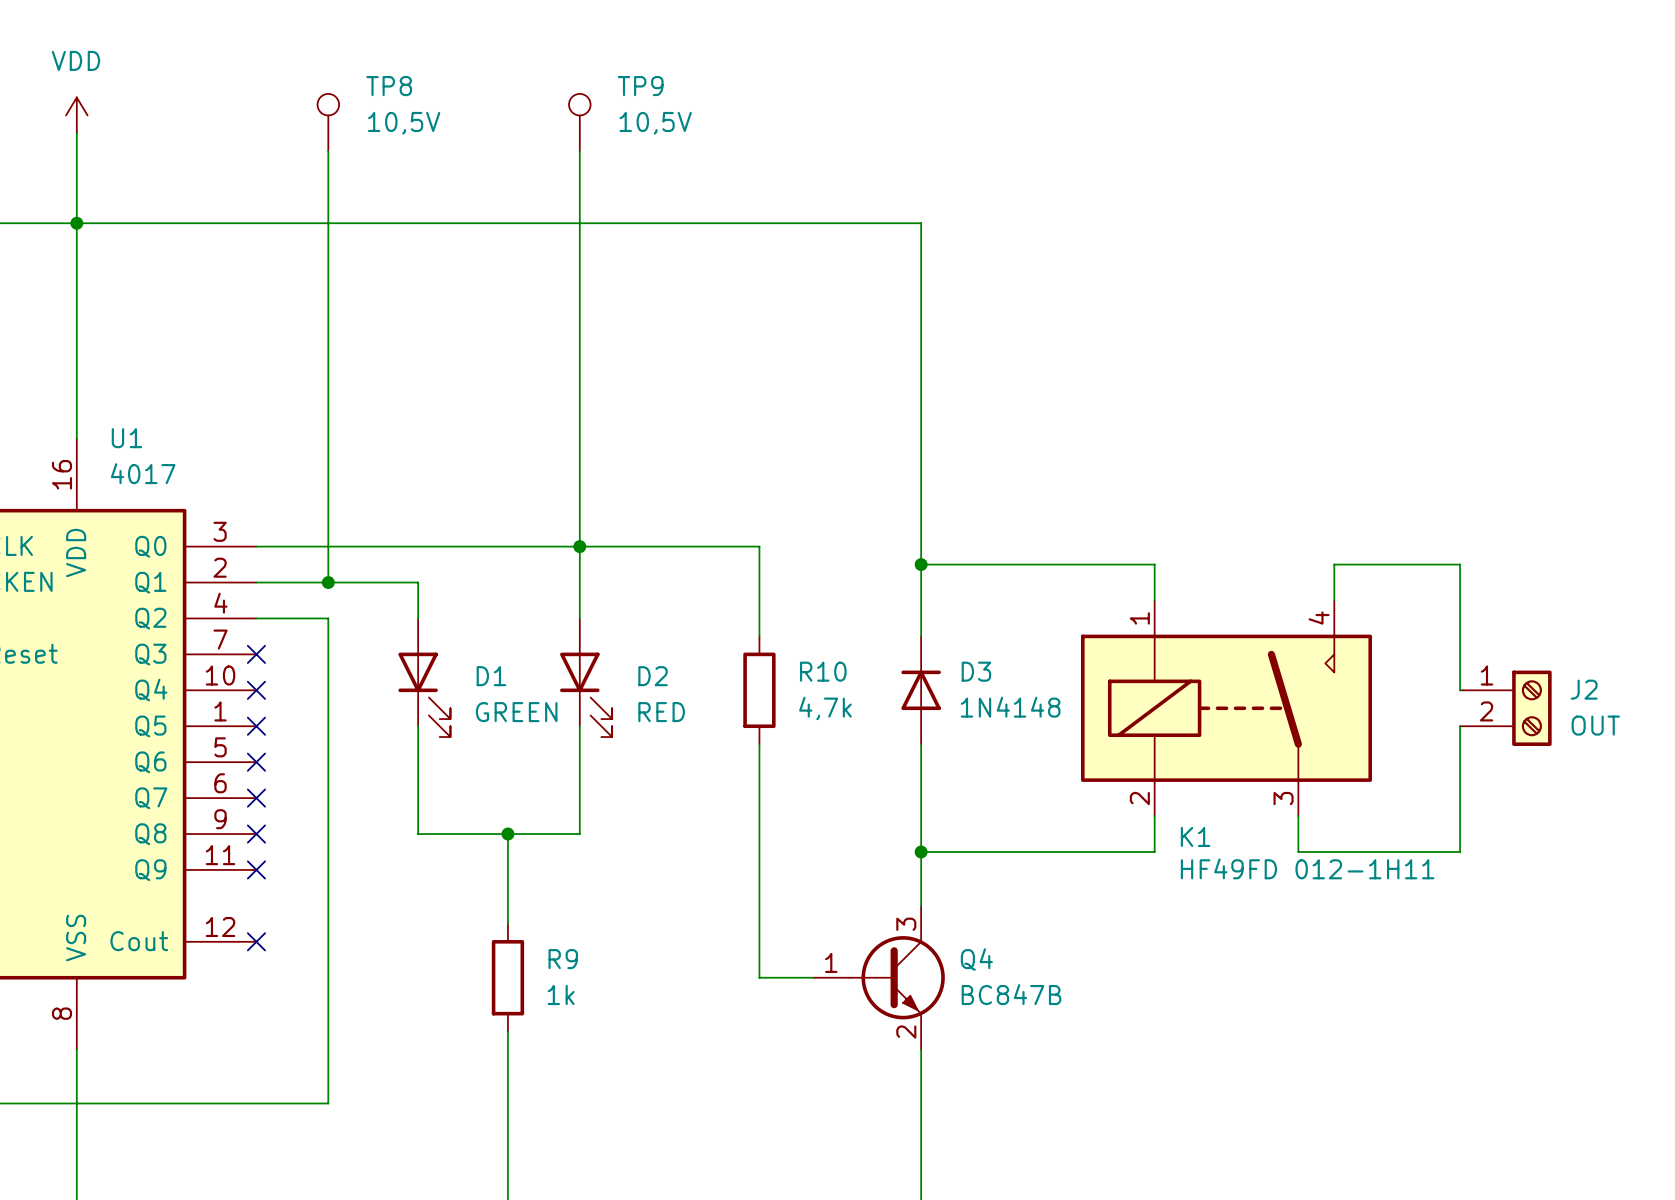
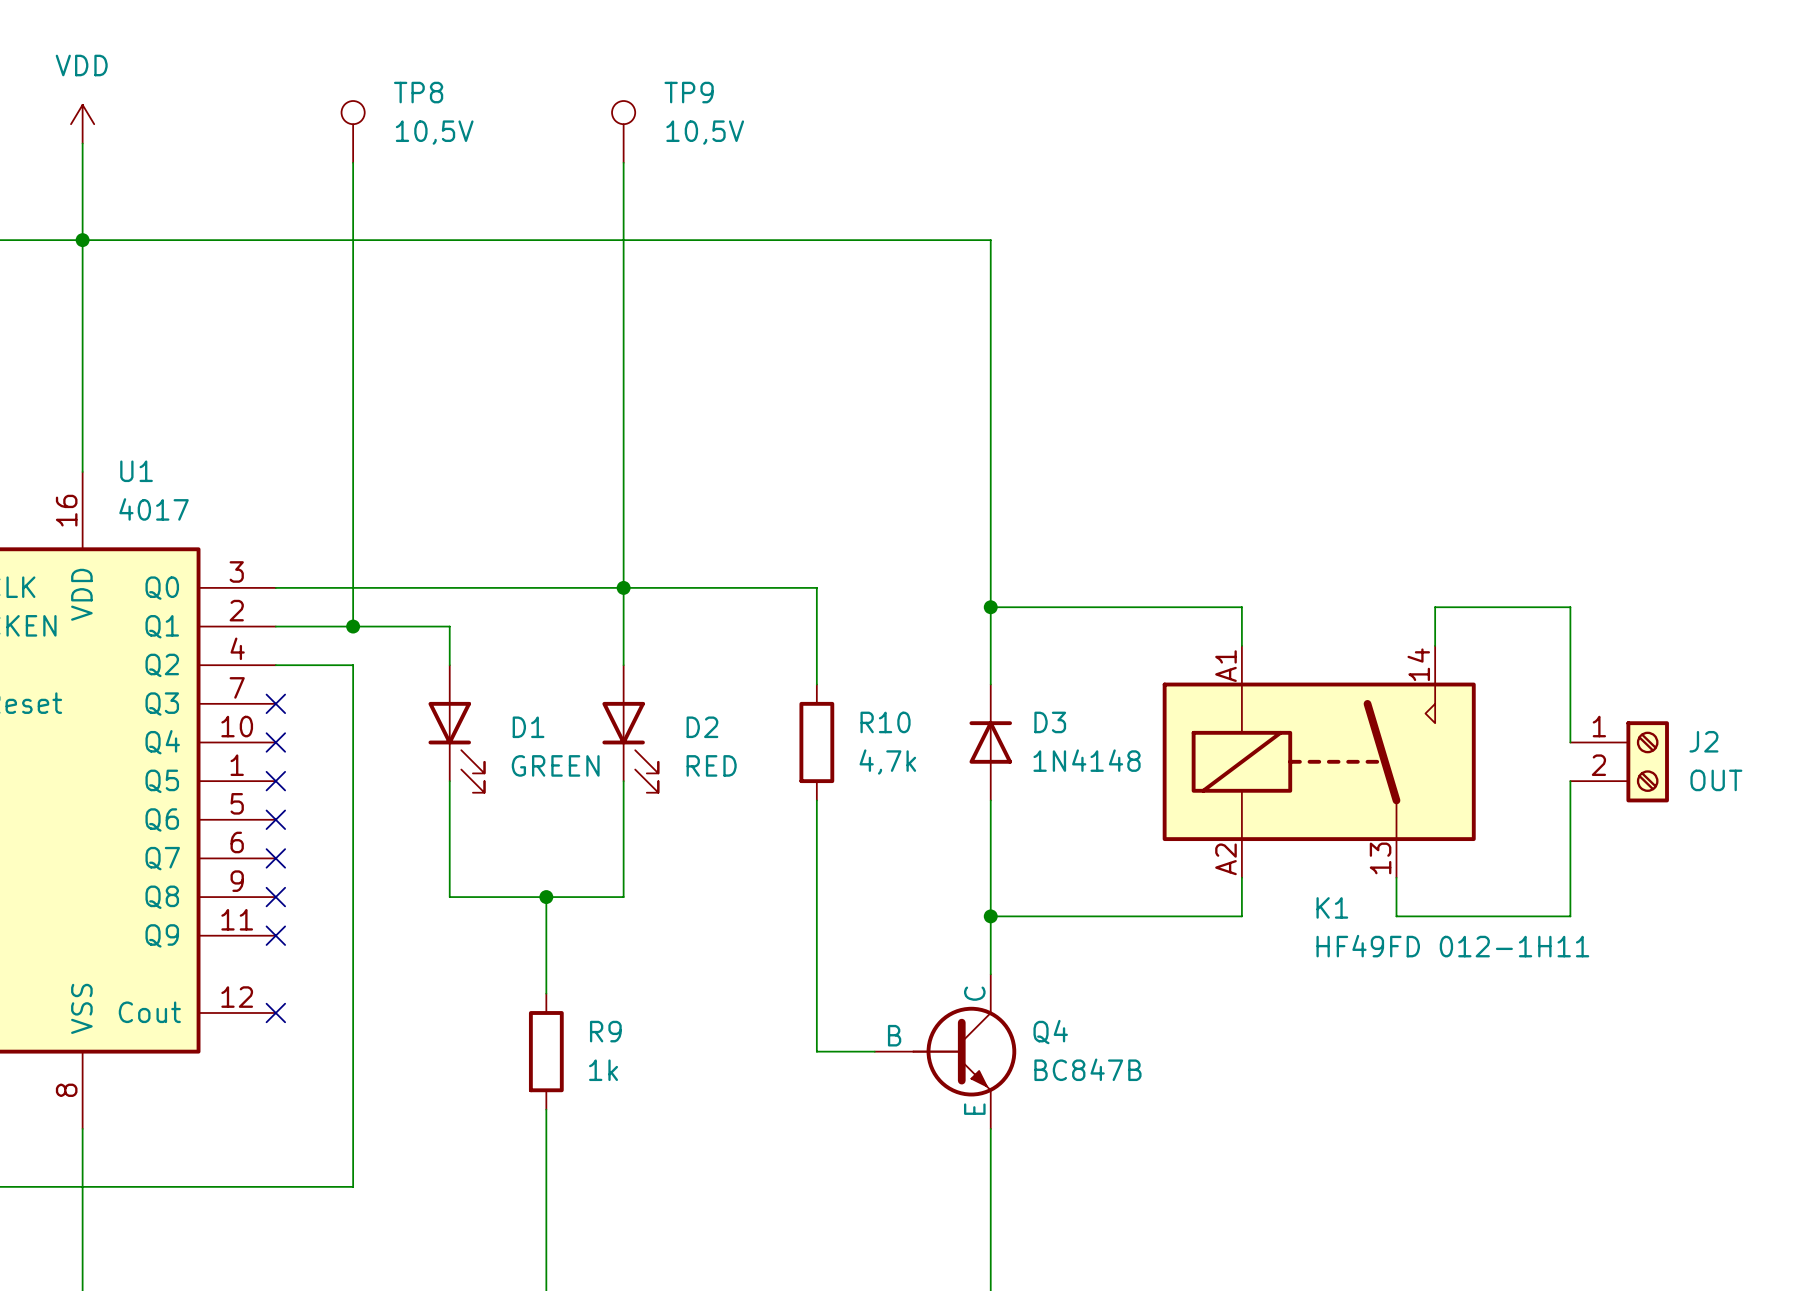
K1 pin number: 1 (1139, 618) -> A1 (1225, 666)
K1 pin number: 4 (1319, 618) -> 14 (1418, 664)
K1 pin number: 2 (1139, 798) -> A2 (1225, 859)
K1 pin number: 3 (1283, 798) -> 13 (1380, 858)
K1 name position: K1 (1195, 836) -> K1 (1332, 907)
K1 value position: HF49FD 012-1H11 (1307, 868) -> HF49FD 012-1H11 (1452, 946)
Q4 symbol: [813, 905, 945, 1050] -> [874, 974, 1017, 1129]

